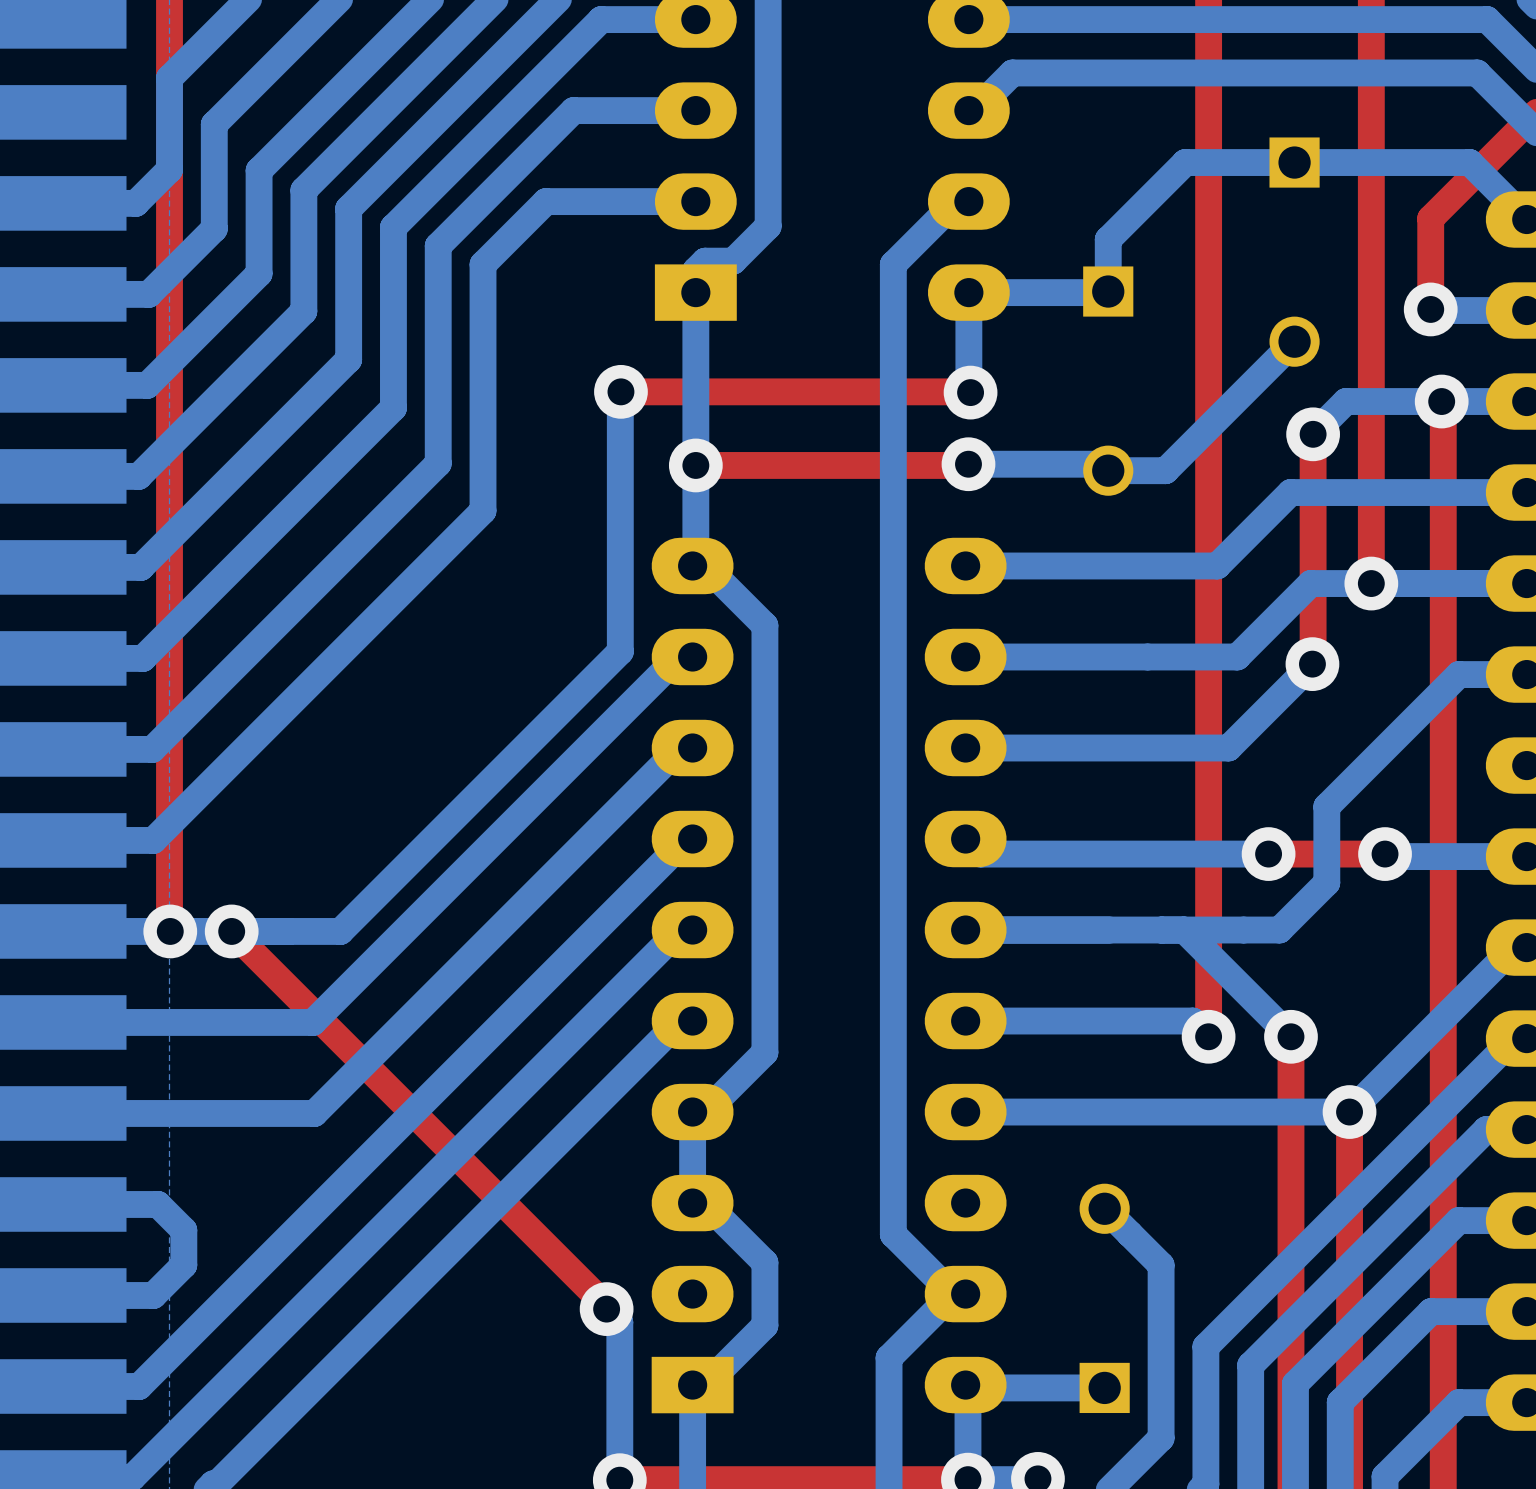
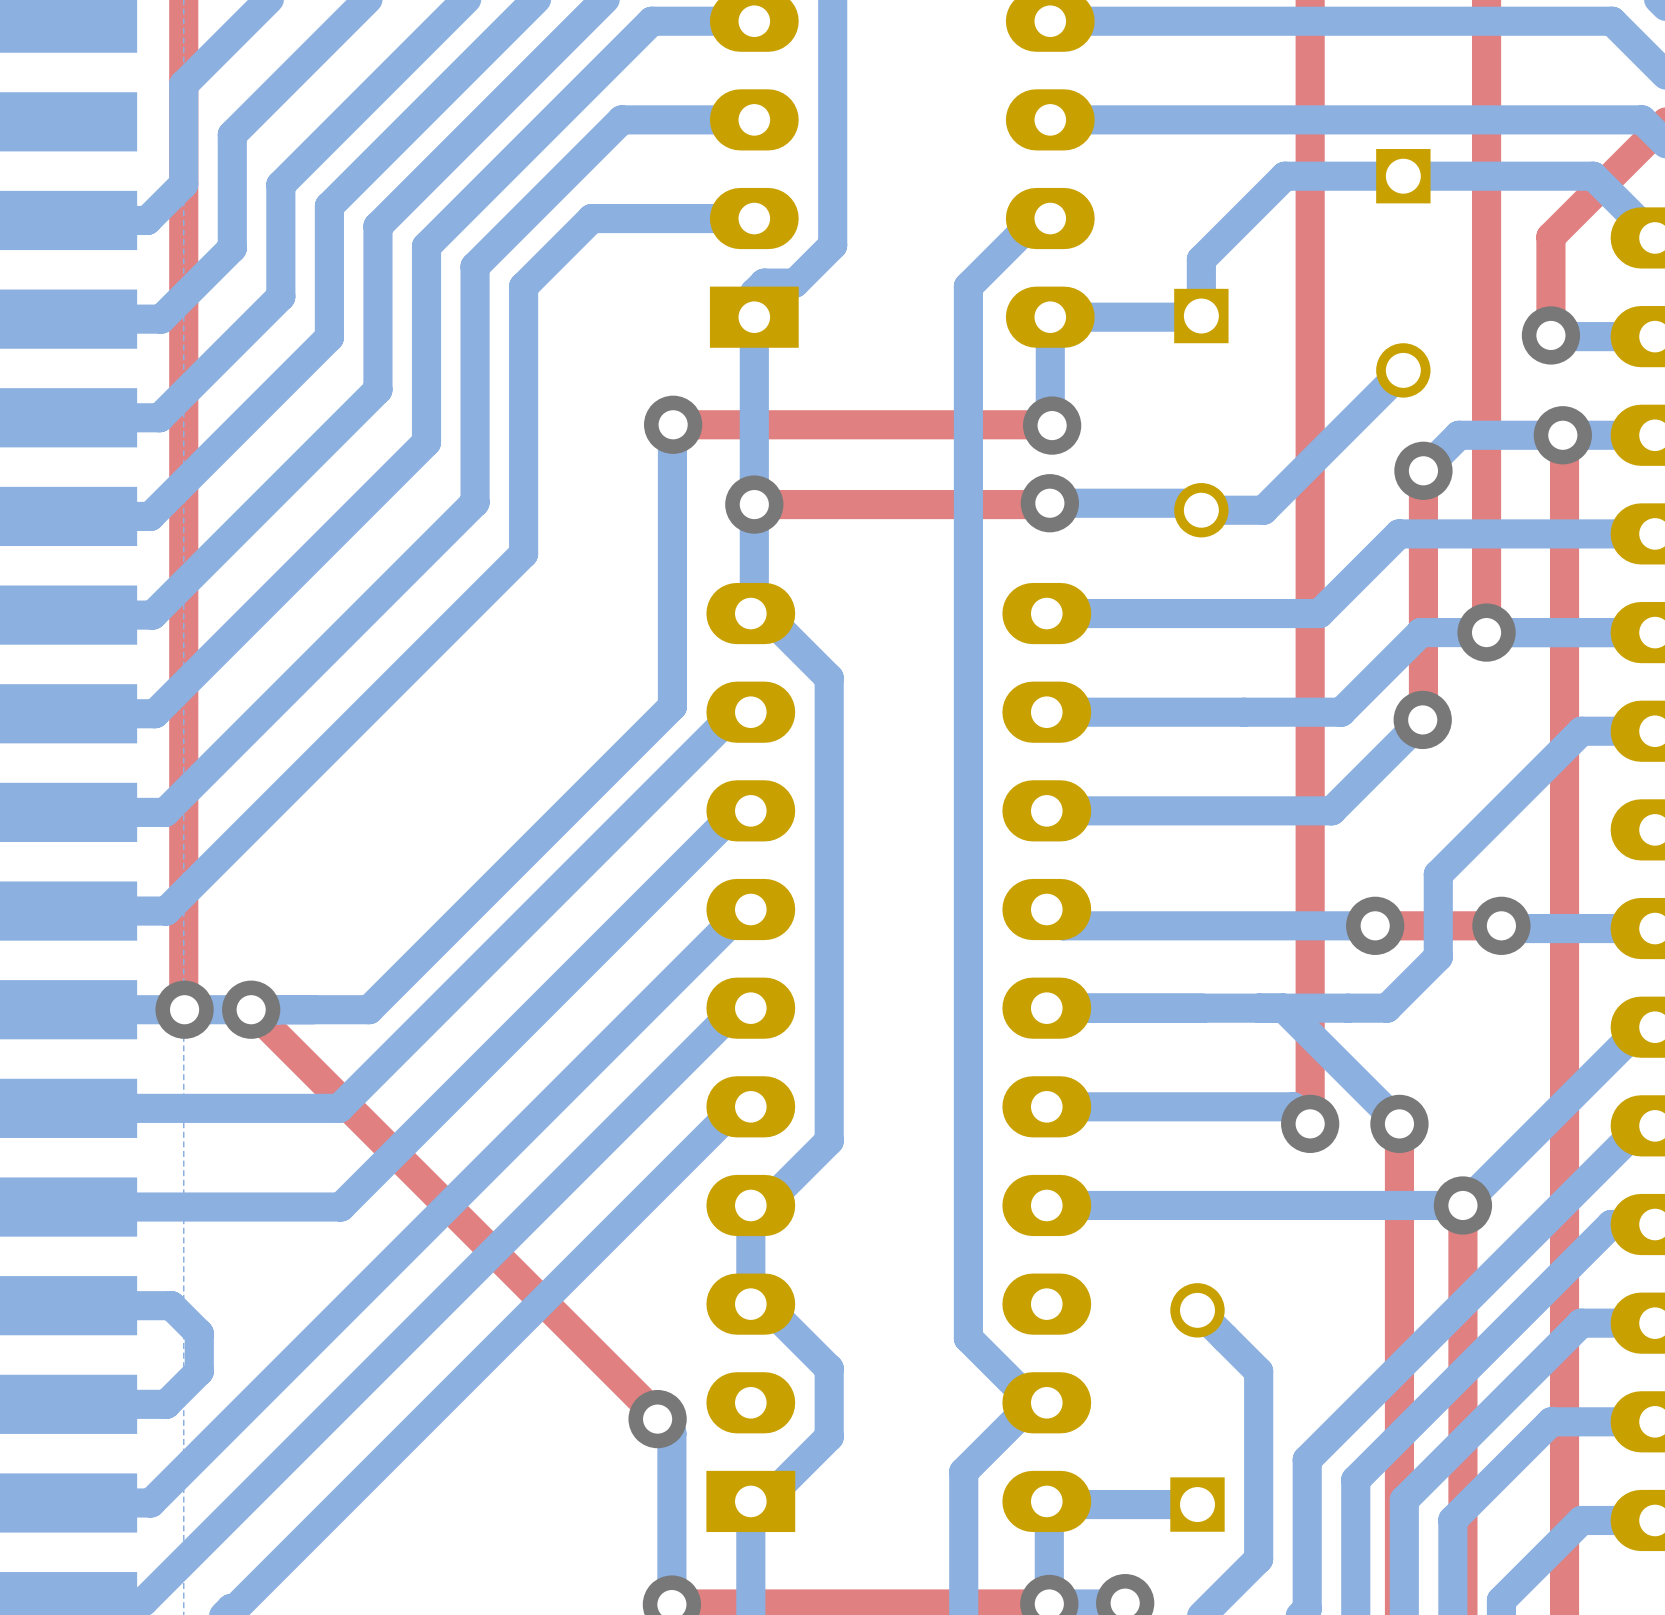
bottom track: (1514, 110) (1477, 72) (1012, 72) (974, 110) -> (1642, 119) (1056, 119)

